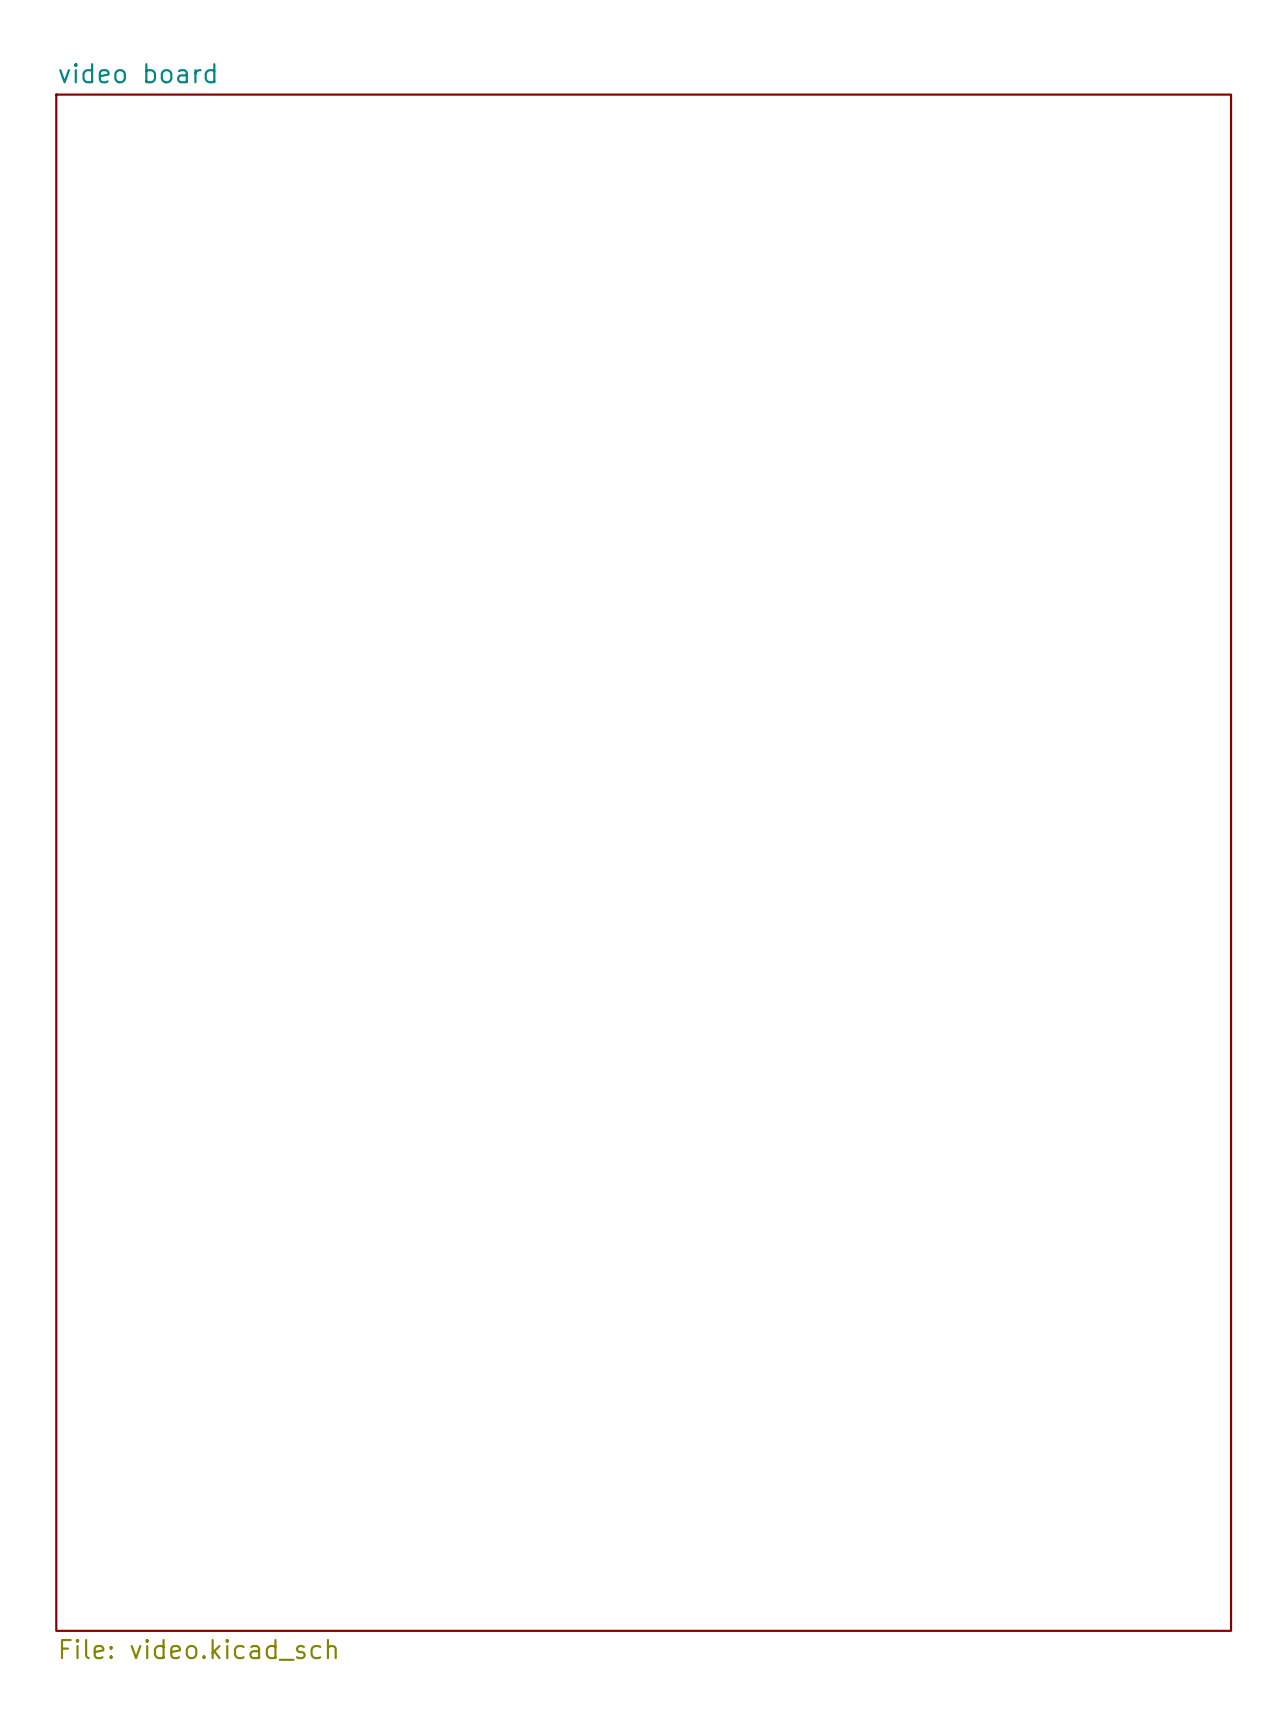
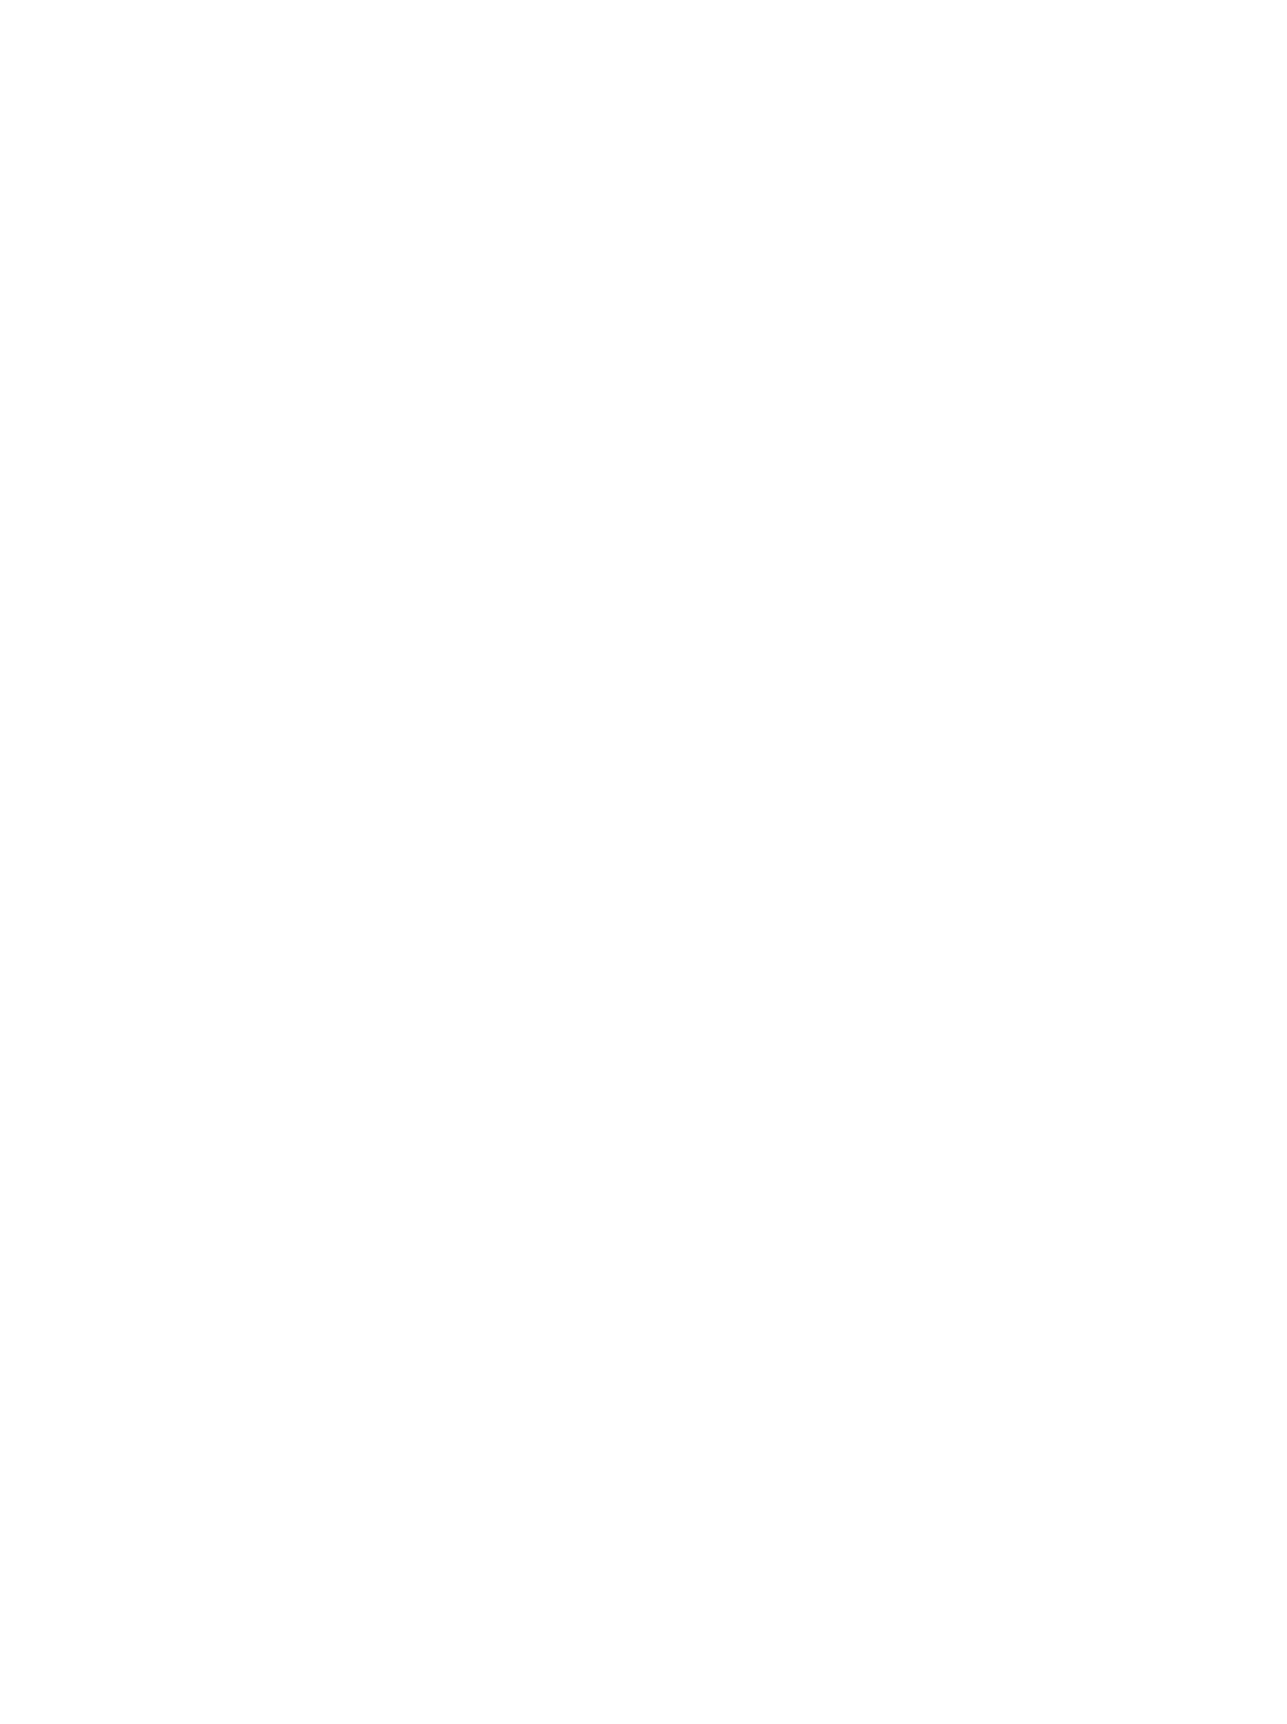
sheet video board: File: video.kicad_sch (643, 862) -> none

